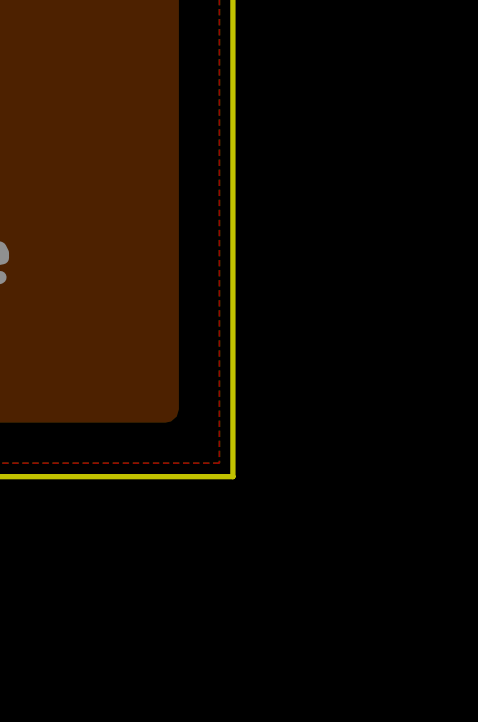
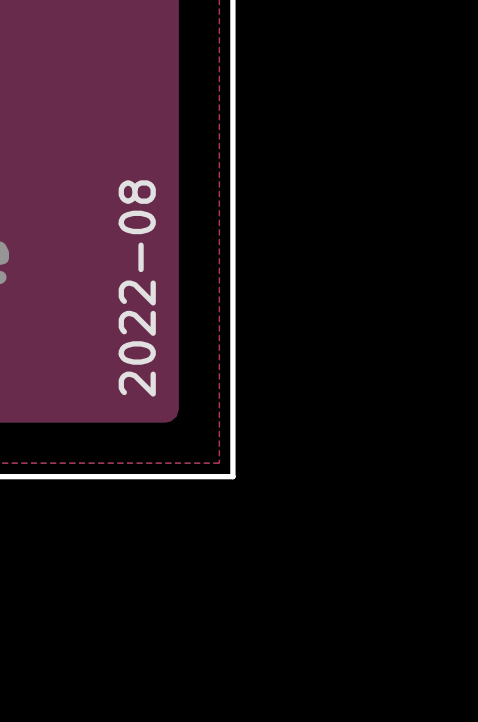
text: none -> 2022-08 (137, 288)

